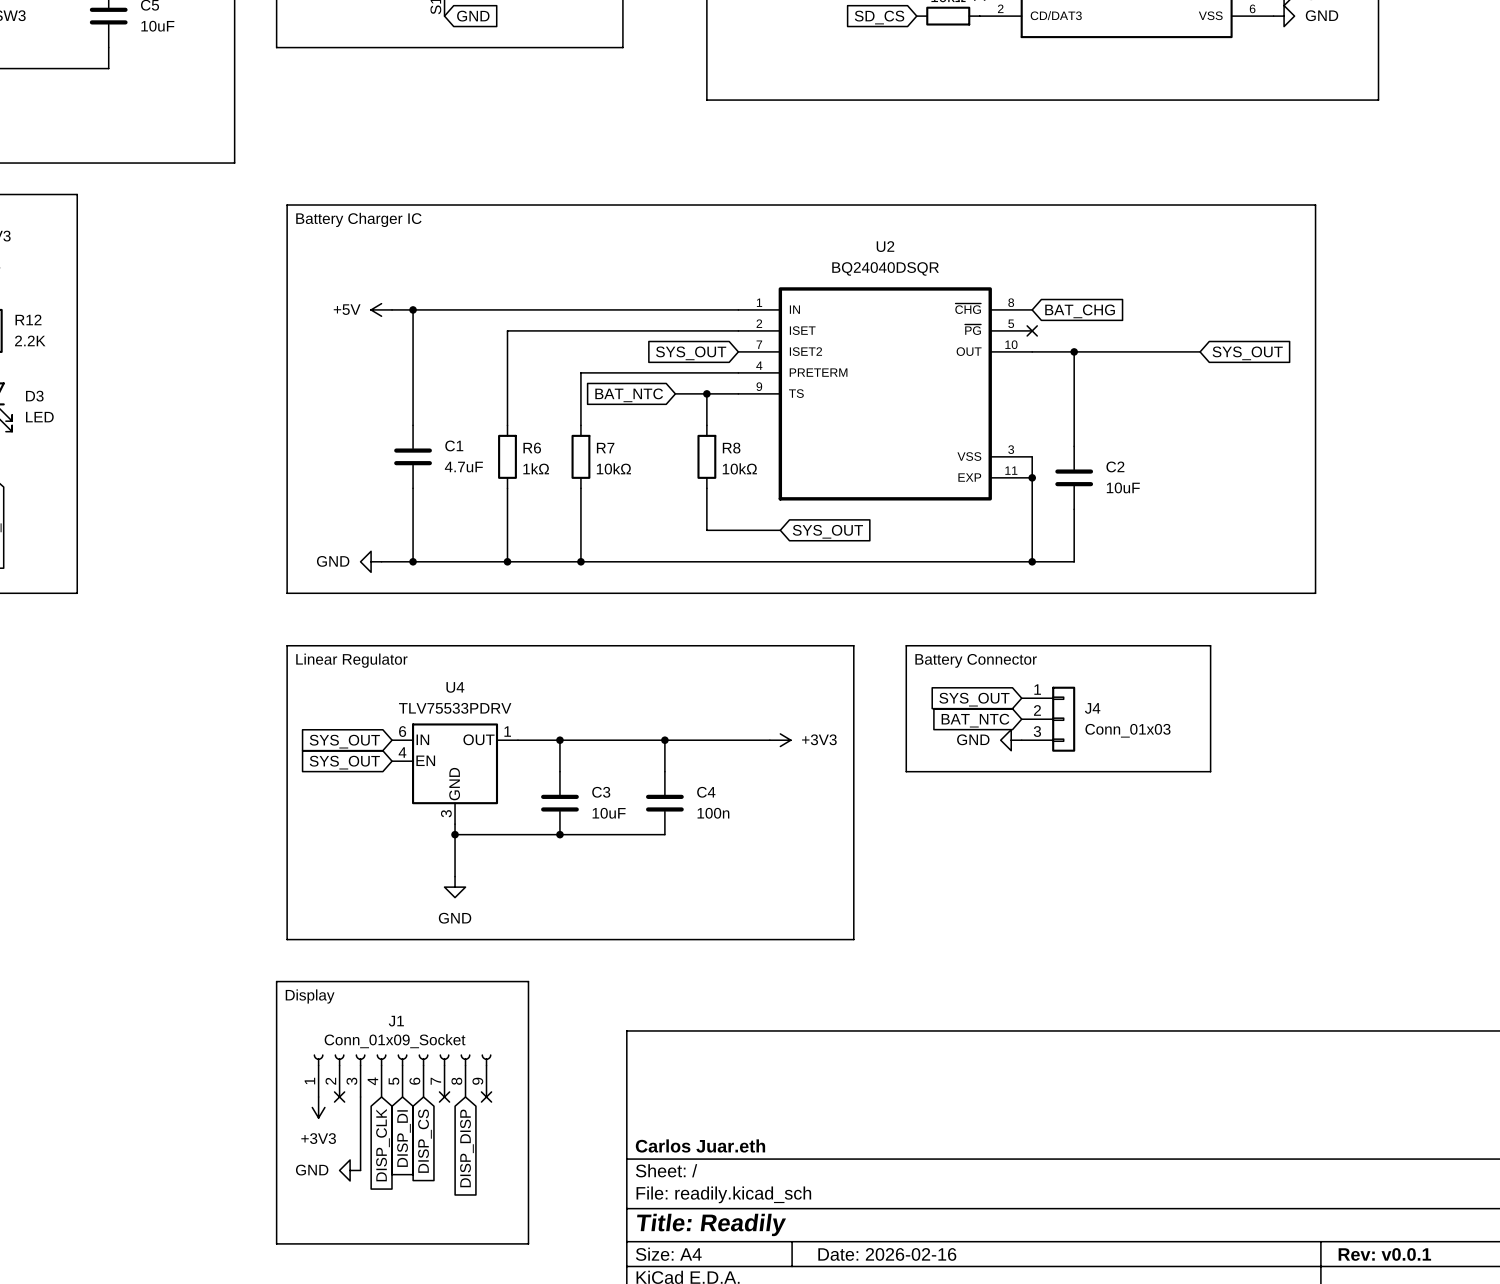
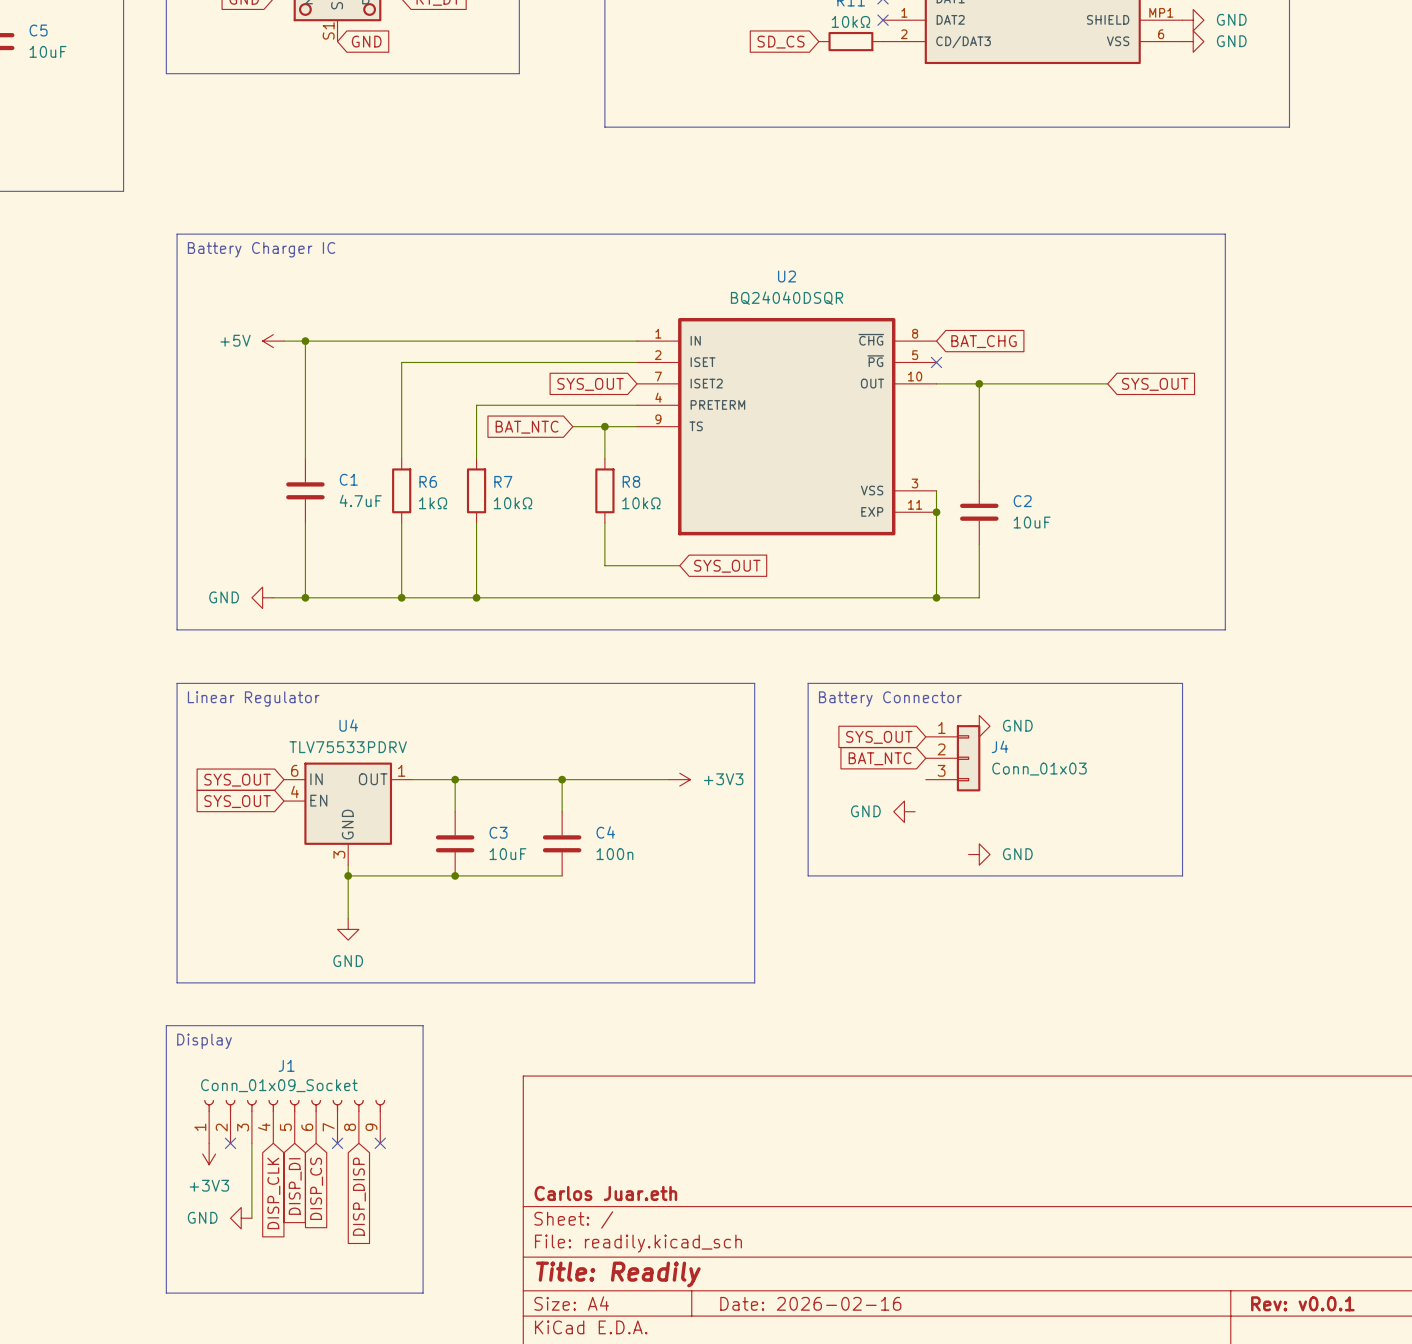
line: (1210, 645) (1210, 771) (906, 771) -> (1118, 683) (1182, 683) (1182, 875) (808, 875) (808, 811)
power symbol: none -> GND (979, 726)
power symbol position: GND (1011, 740) -> GND (904, 811)
power symbol: none -> GND (979, 854)

